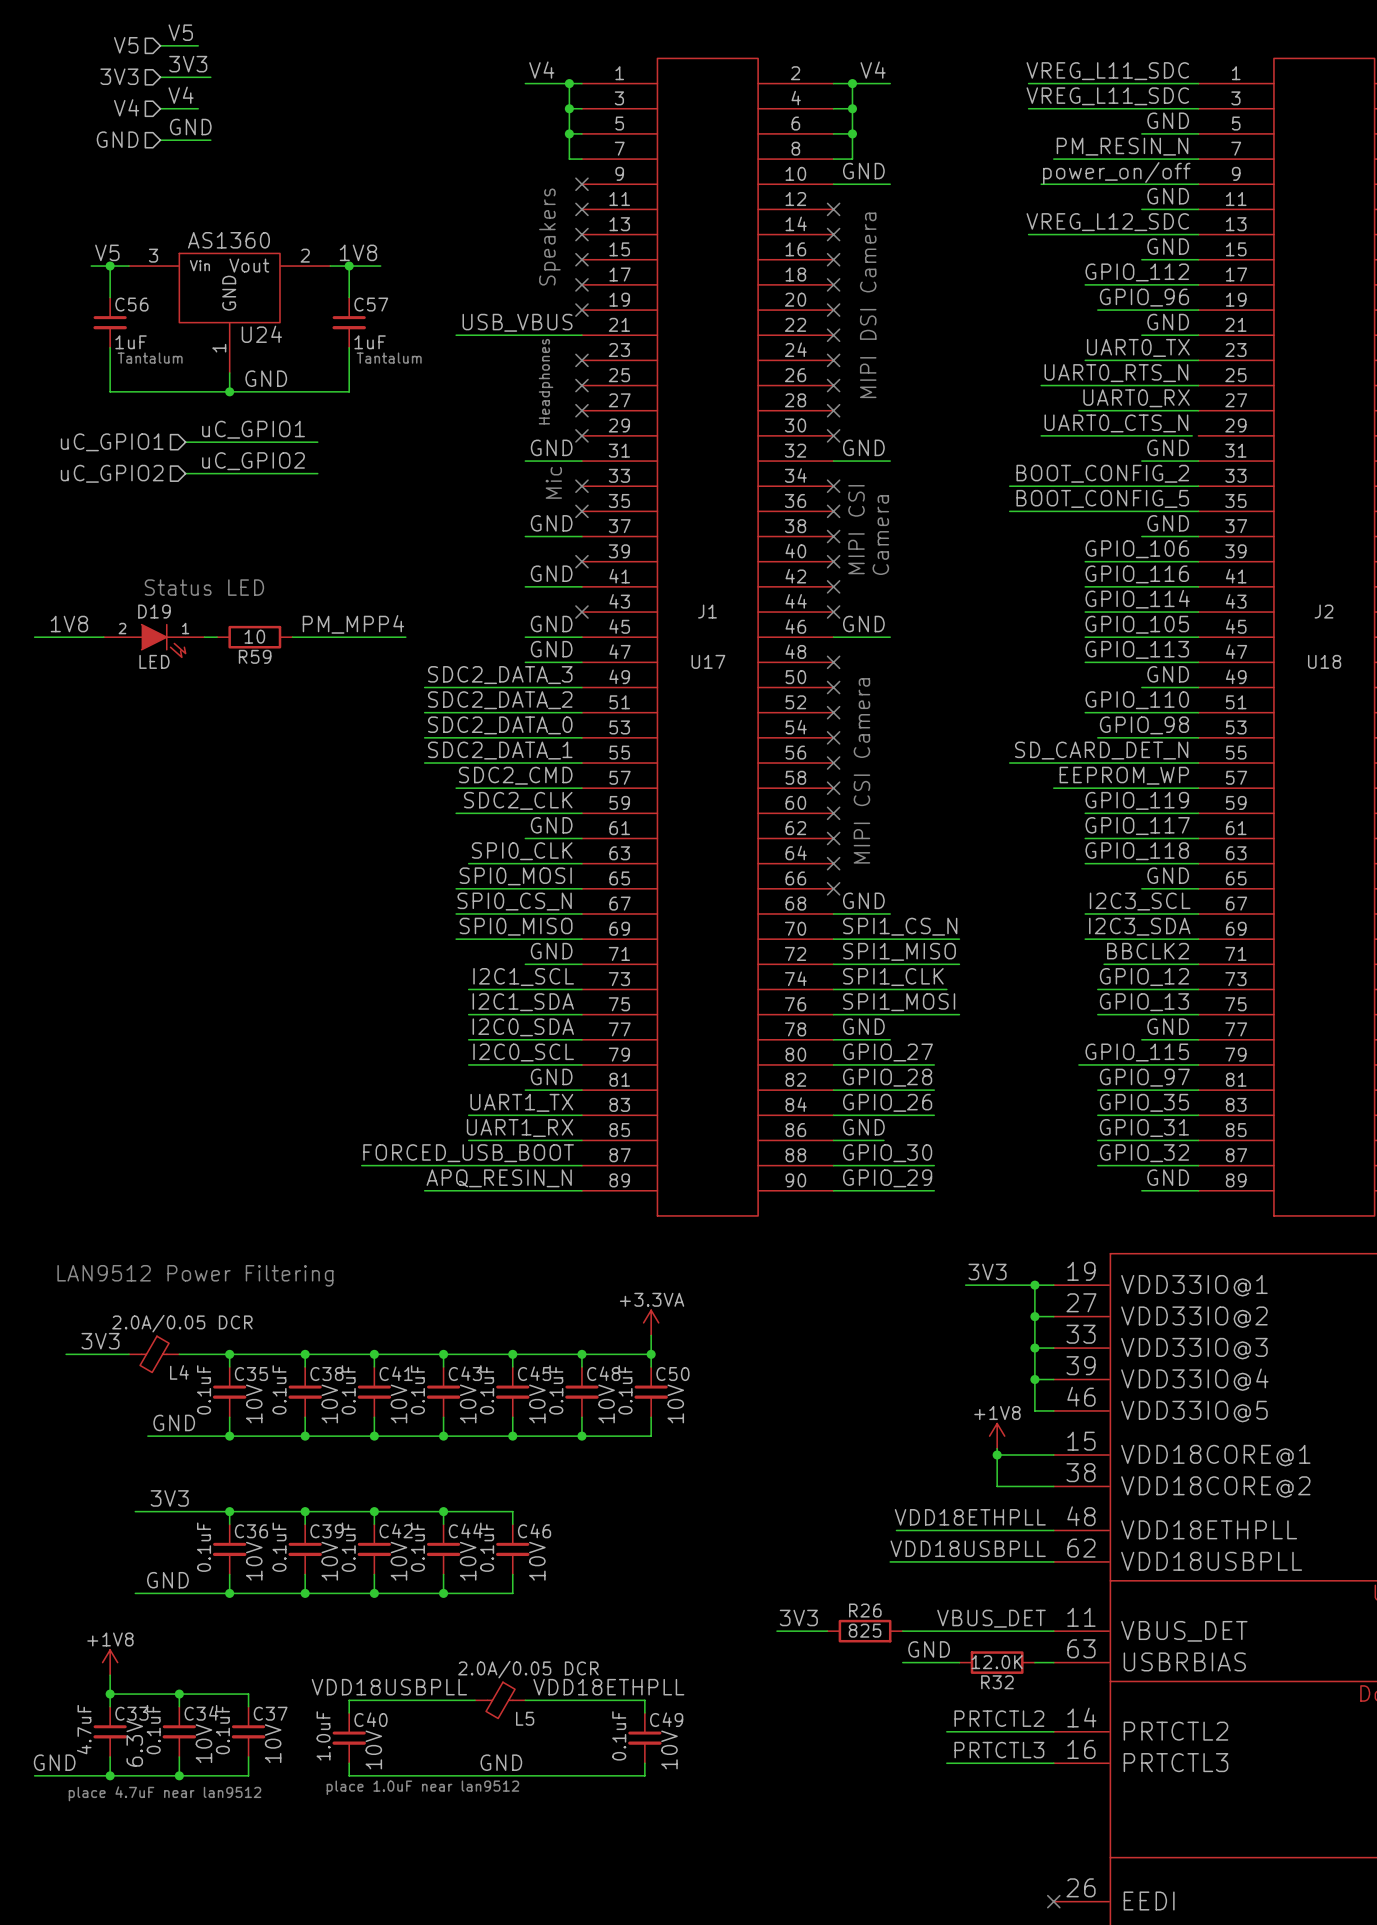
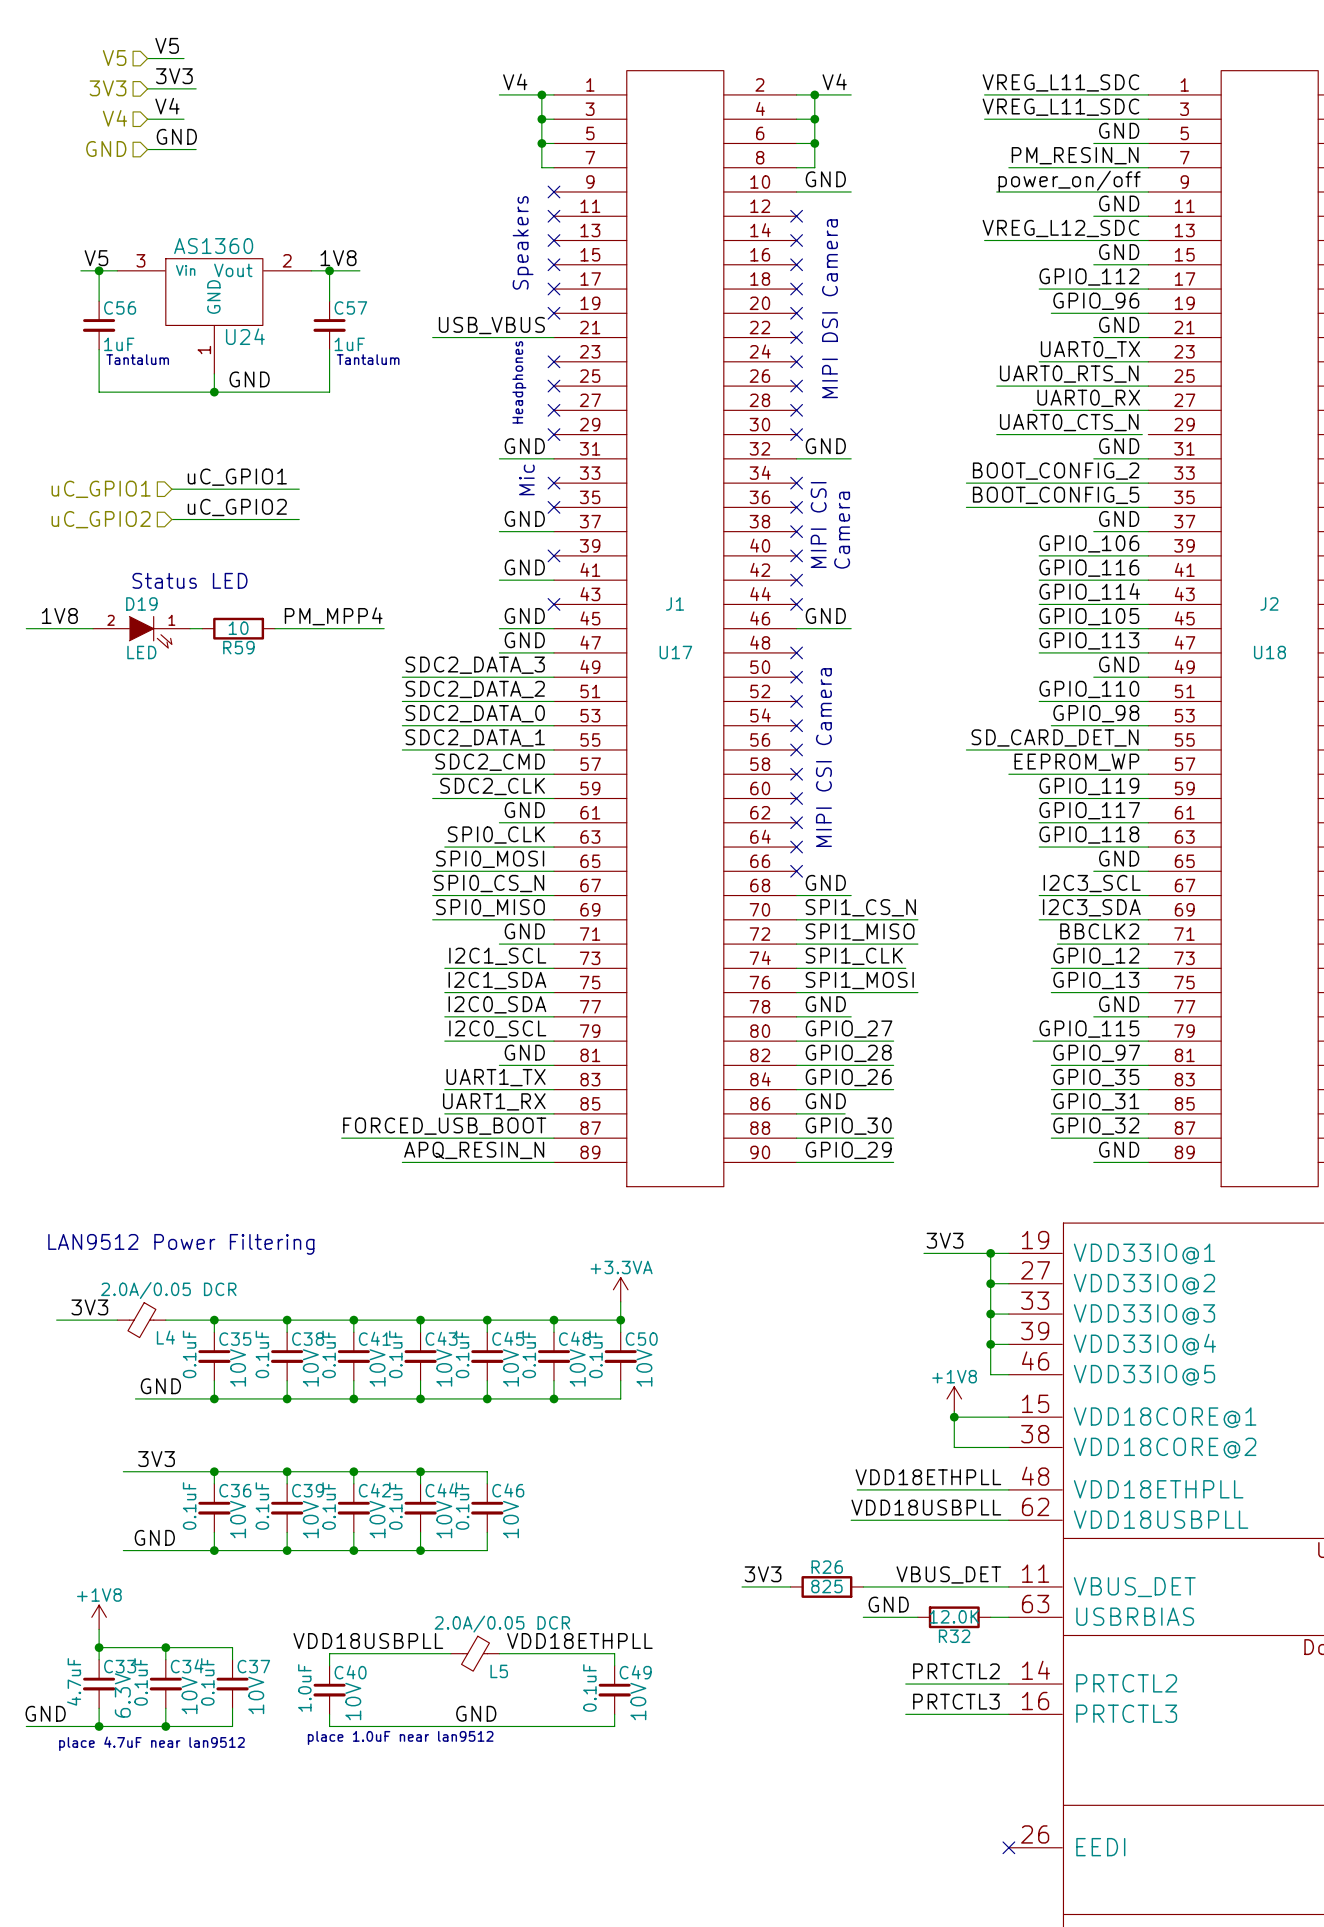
label position: uC_GPIO1 (253, 429) -> uC_GPIO1 (237, 477)
hierarchical label position: uC_GPIO1 (112, 442) -> uC_GPIO1 (101, 489)
wire: (185, 442) (317, 442) -> (171, 489) (299, 489)
label position: uC_GPIO2 (253, 461) -> uC_GPIO2 (237, 507)
hierarchical label position: uC_GPIO2 (112, 473) -> uC_GPIO2 (101, 519)
wire: (185, 473) (317, 473) -> (171, 519) (299, 519)

